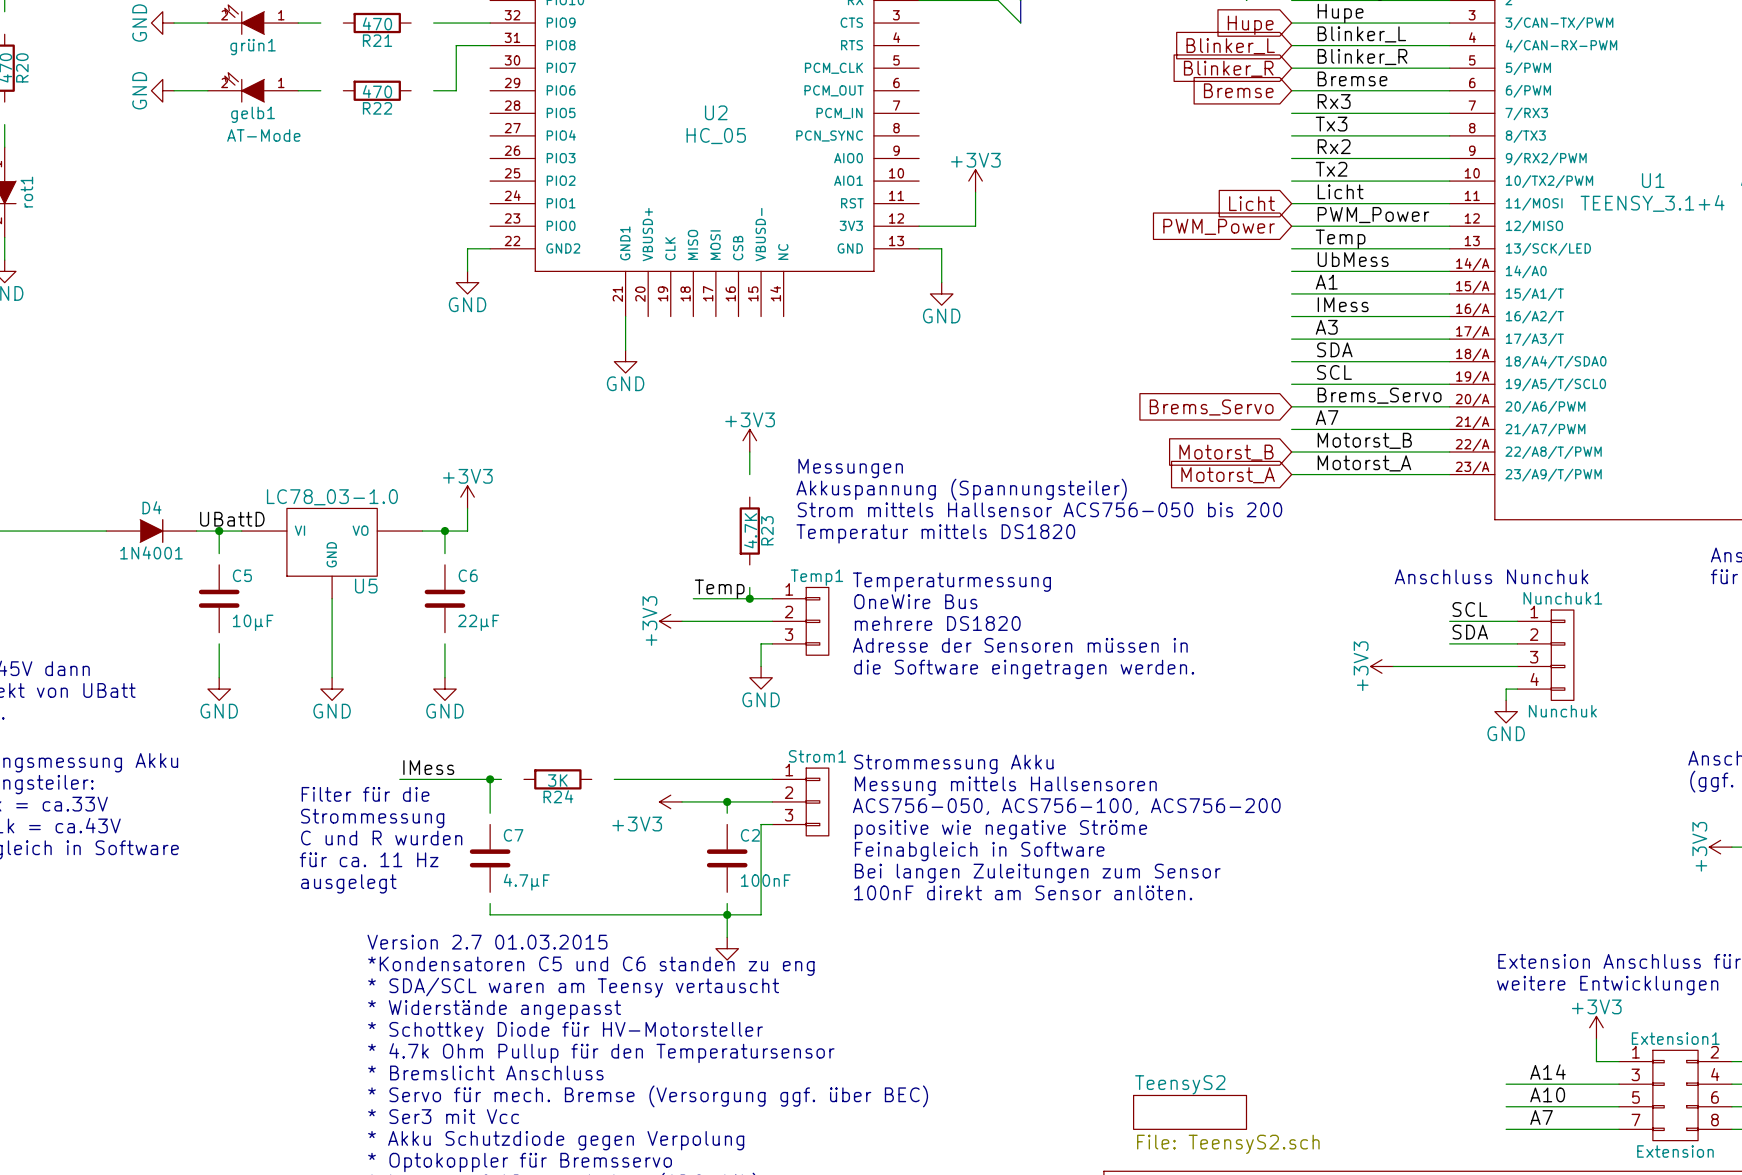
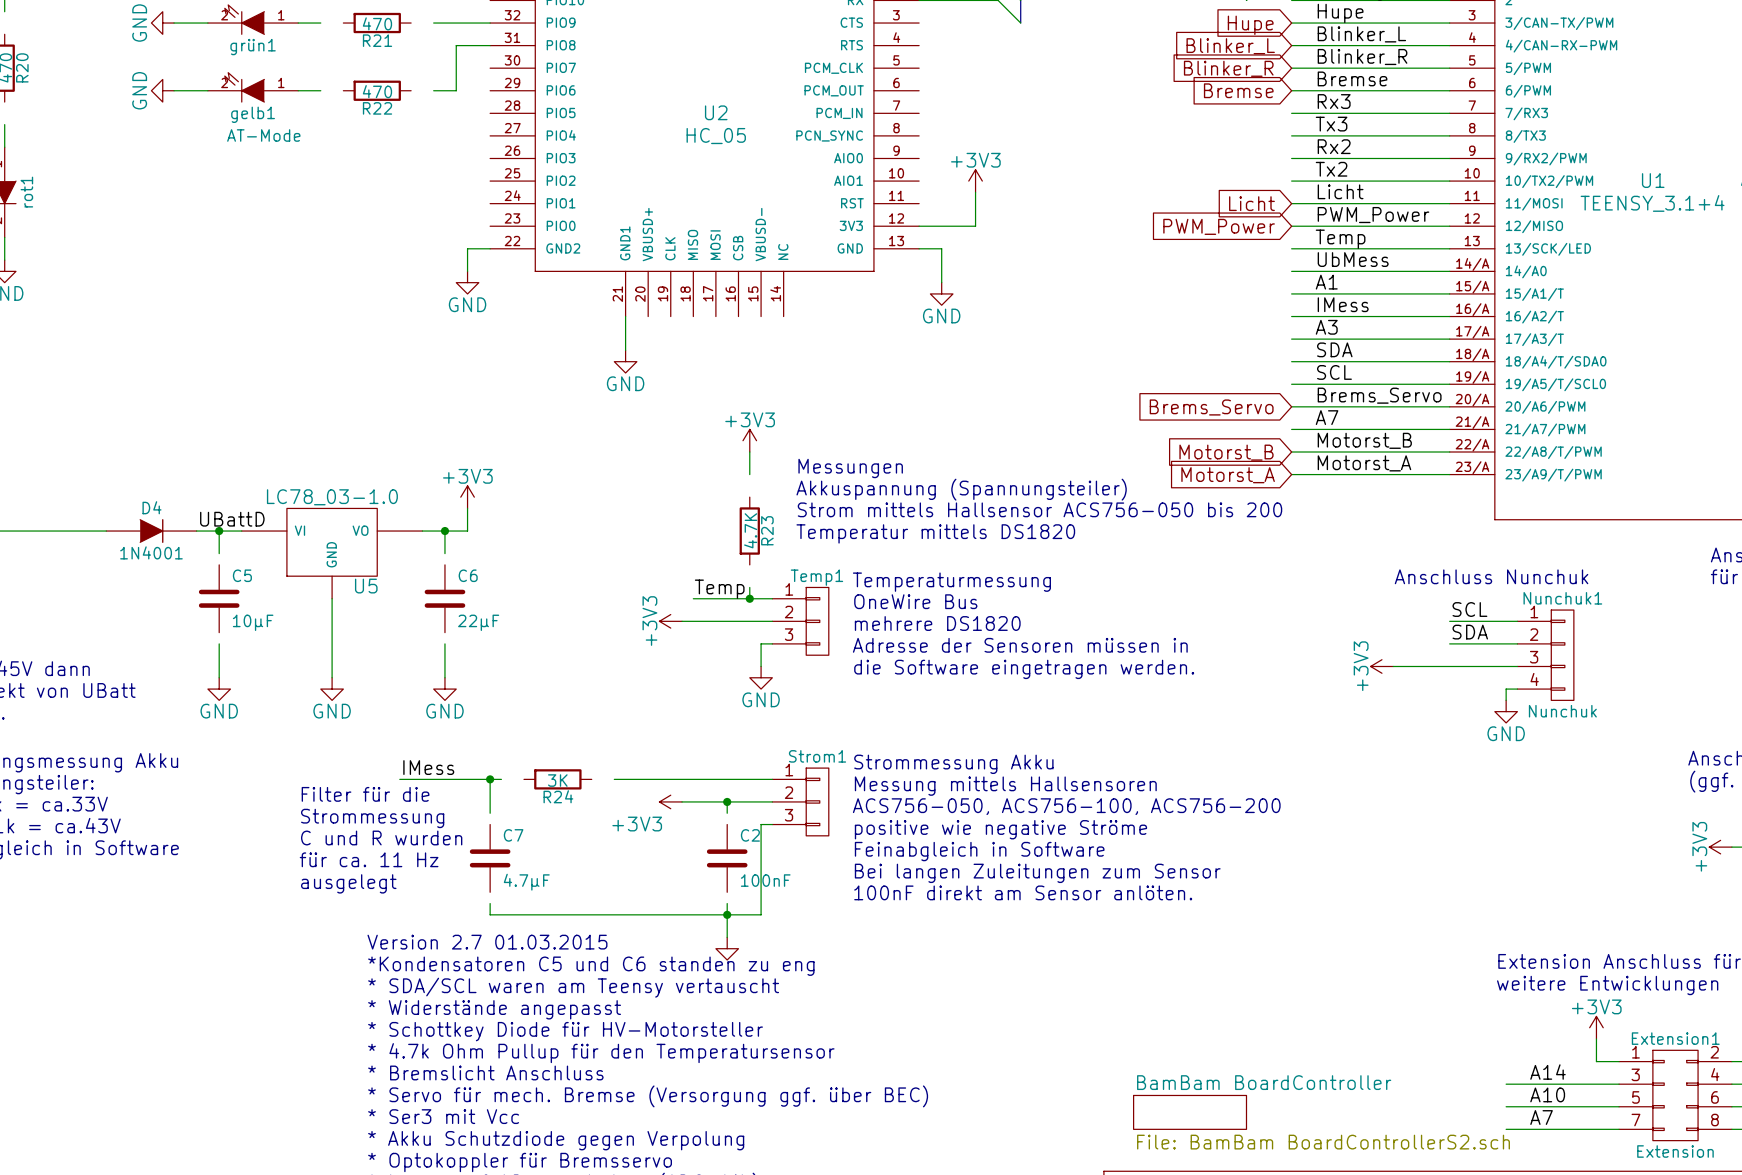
sheet TeensyS2 name: TeensyS2 (1180, 1084) -> BamBam BoardController (1264, 1082)
sheet TeensyS2 value: File: TeensyS2.sch (1228, 1144) -> File: BamBam BoardControllerS2.sch (1323, 1142)

